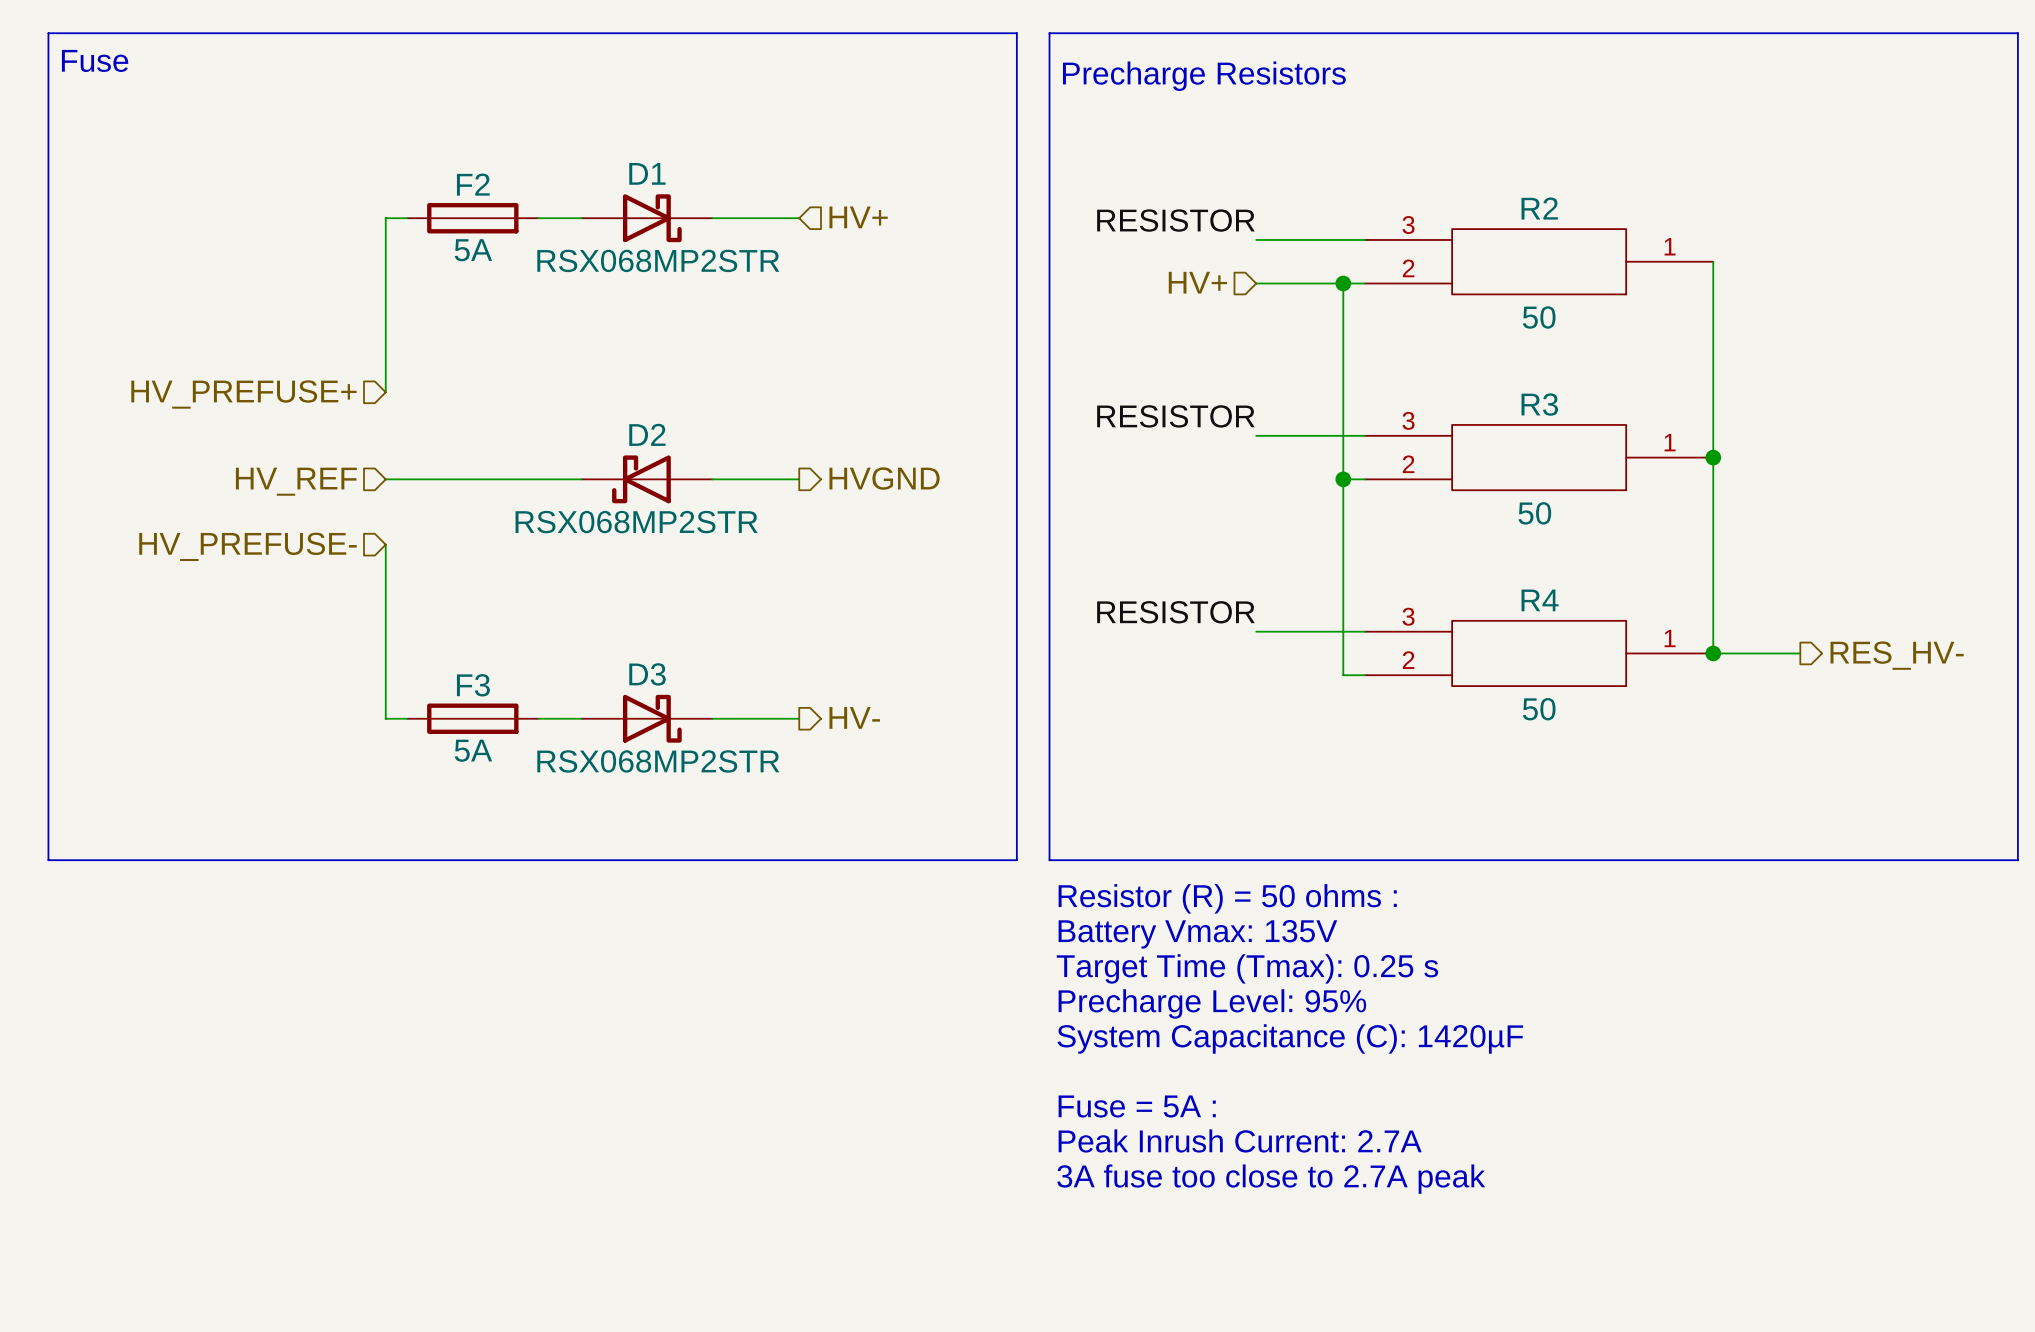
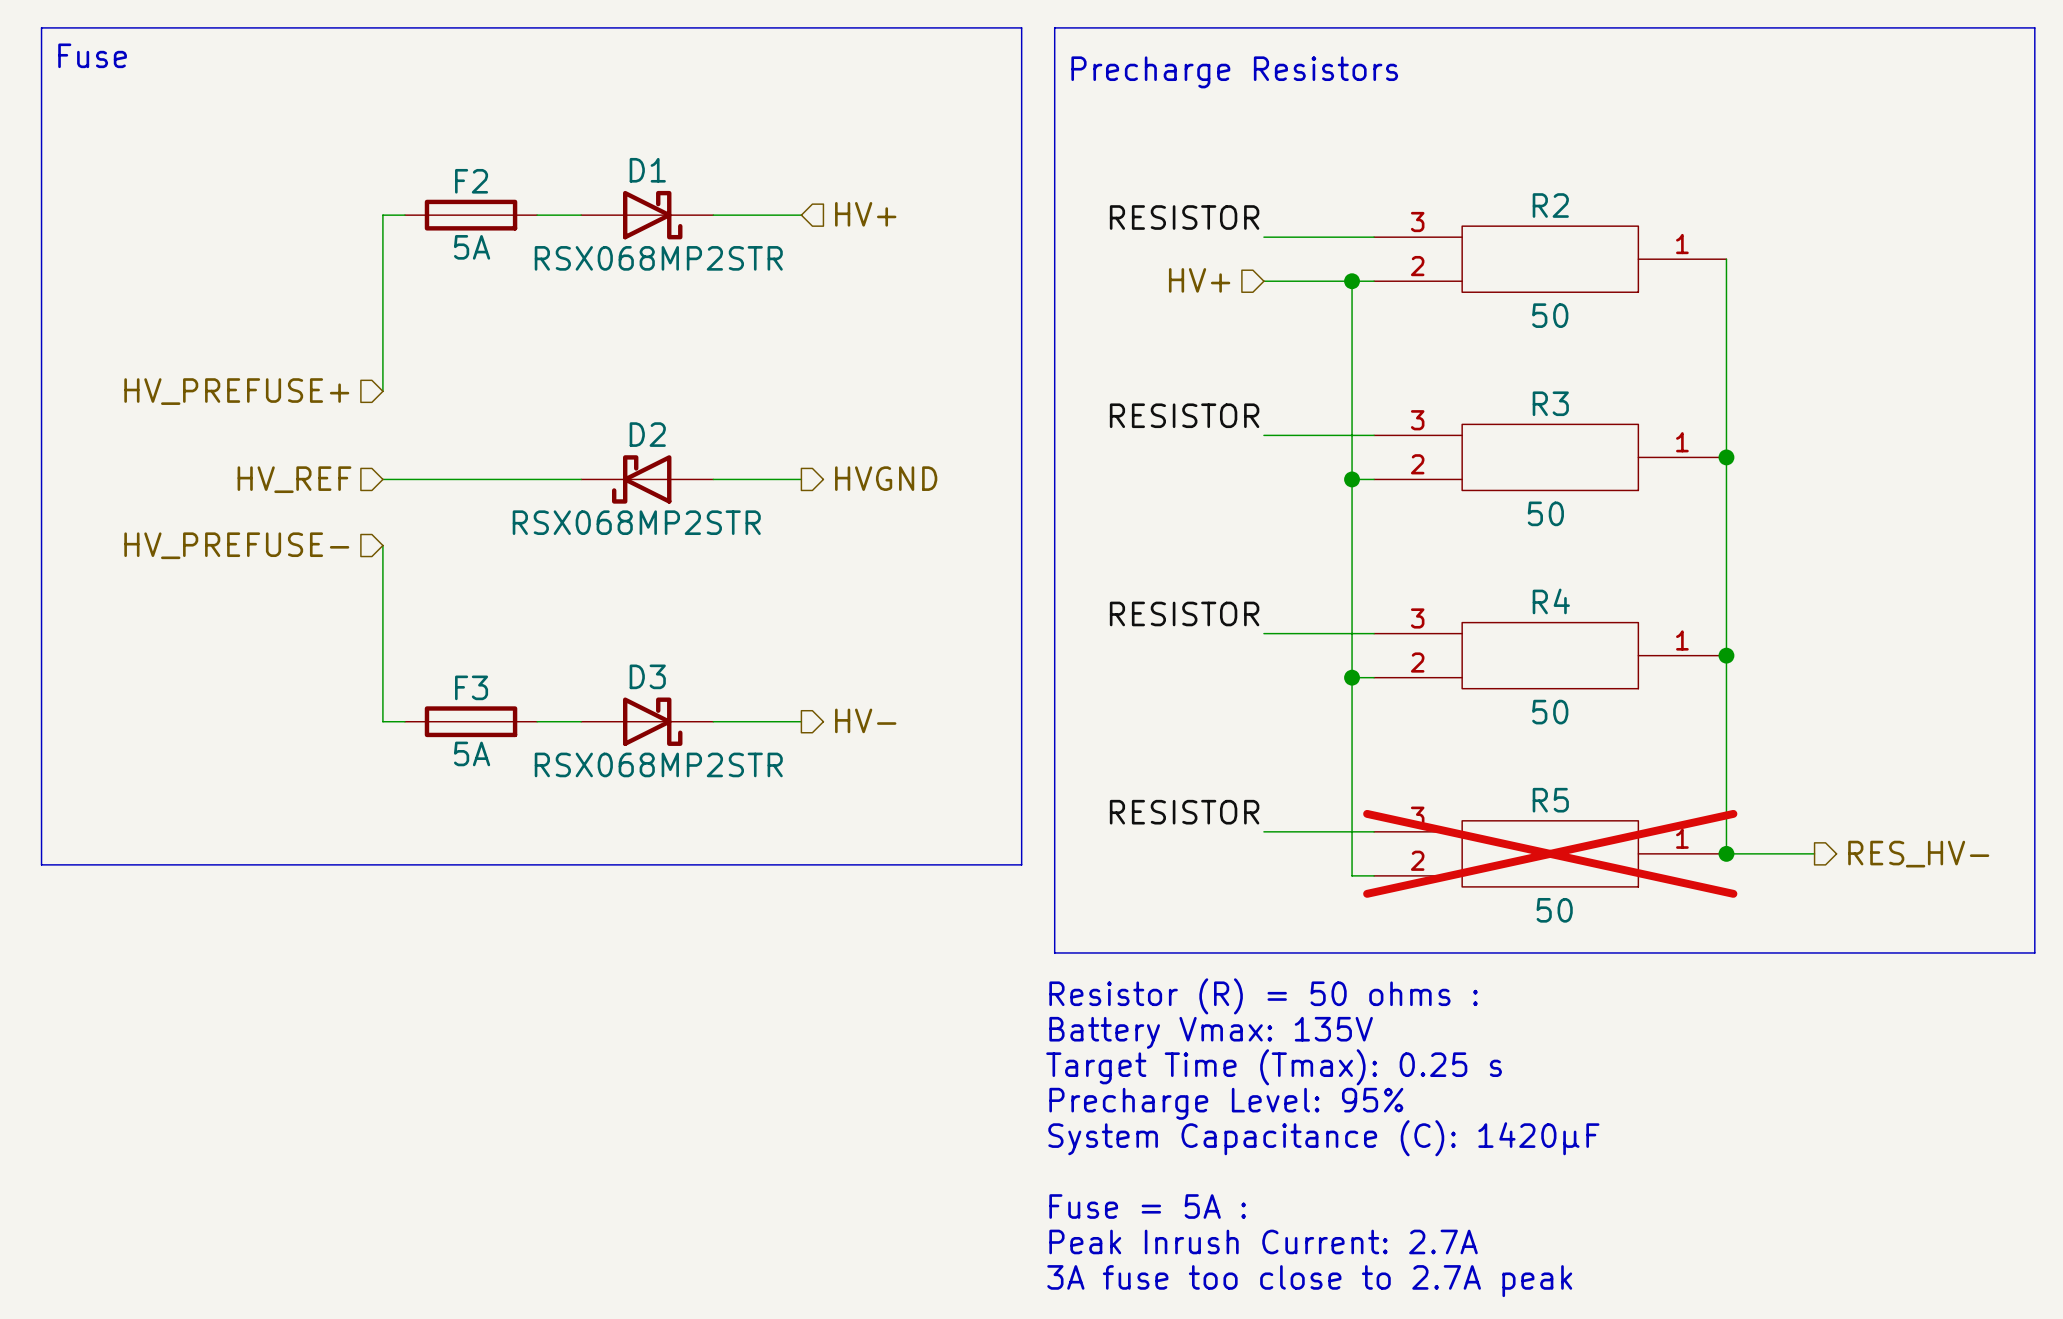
wire: (1713, 653) (1800, 653) -> (1726, 655) (1726, 853) (1814, 853)
hierarchical label position: RES_HV- (1897, 655) -> RES_HV- (1918, 854)
wire: none -> (1352, 677) (1352, 875) (1374, 875)
junction: none -> (1352, 677)
label: none -> RESISTOR (1184, 812)
wire: none -> (1263, 831) (1374, 831)
R5: none -> 50 (1550, 853)
junction: none -> (1726, 853)
line: (1049, 860) (2017, 860) -> (1054, 864) (1054, 952) (2034, 952) (2034, 864)
text position: Resistor (R) = 50 ohms : (1227, 898) -> Resistor (R) = 50 ohms : (1263, 996)
text position: Battery Vmax: 135V (1197, 934) -> Battery Vmax: 135V (1211, 1032)
text position: Target Time (Tmax): 0.25 s (1247, 968) -> Target Time (Tmax): 0.25 s (1274, 1067)
text position: Precharge Level: 95% (1212, 1003) -> Precharge Level: 95% (1226, 1103)
text position: System Capacitance (C): 1420µF (1290, 1038) -> System Capacitance (C): 1420µF (1323, 1138)
text position: Fuse = 5A : (1137, 1106) -> Fuse = 5A : (1147, 1206)
text position: Peak Inrush Current: 2.7A (1240, 1140) -> Peak Inrush Current: 2.7A (1263, 1241)
text position: 3A fuse too close to 2.7A peak (1271, 1179) -> 3A fuse too close to 2.7A peak (1309, 1281)

